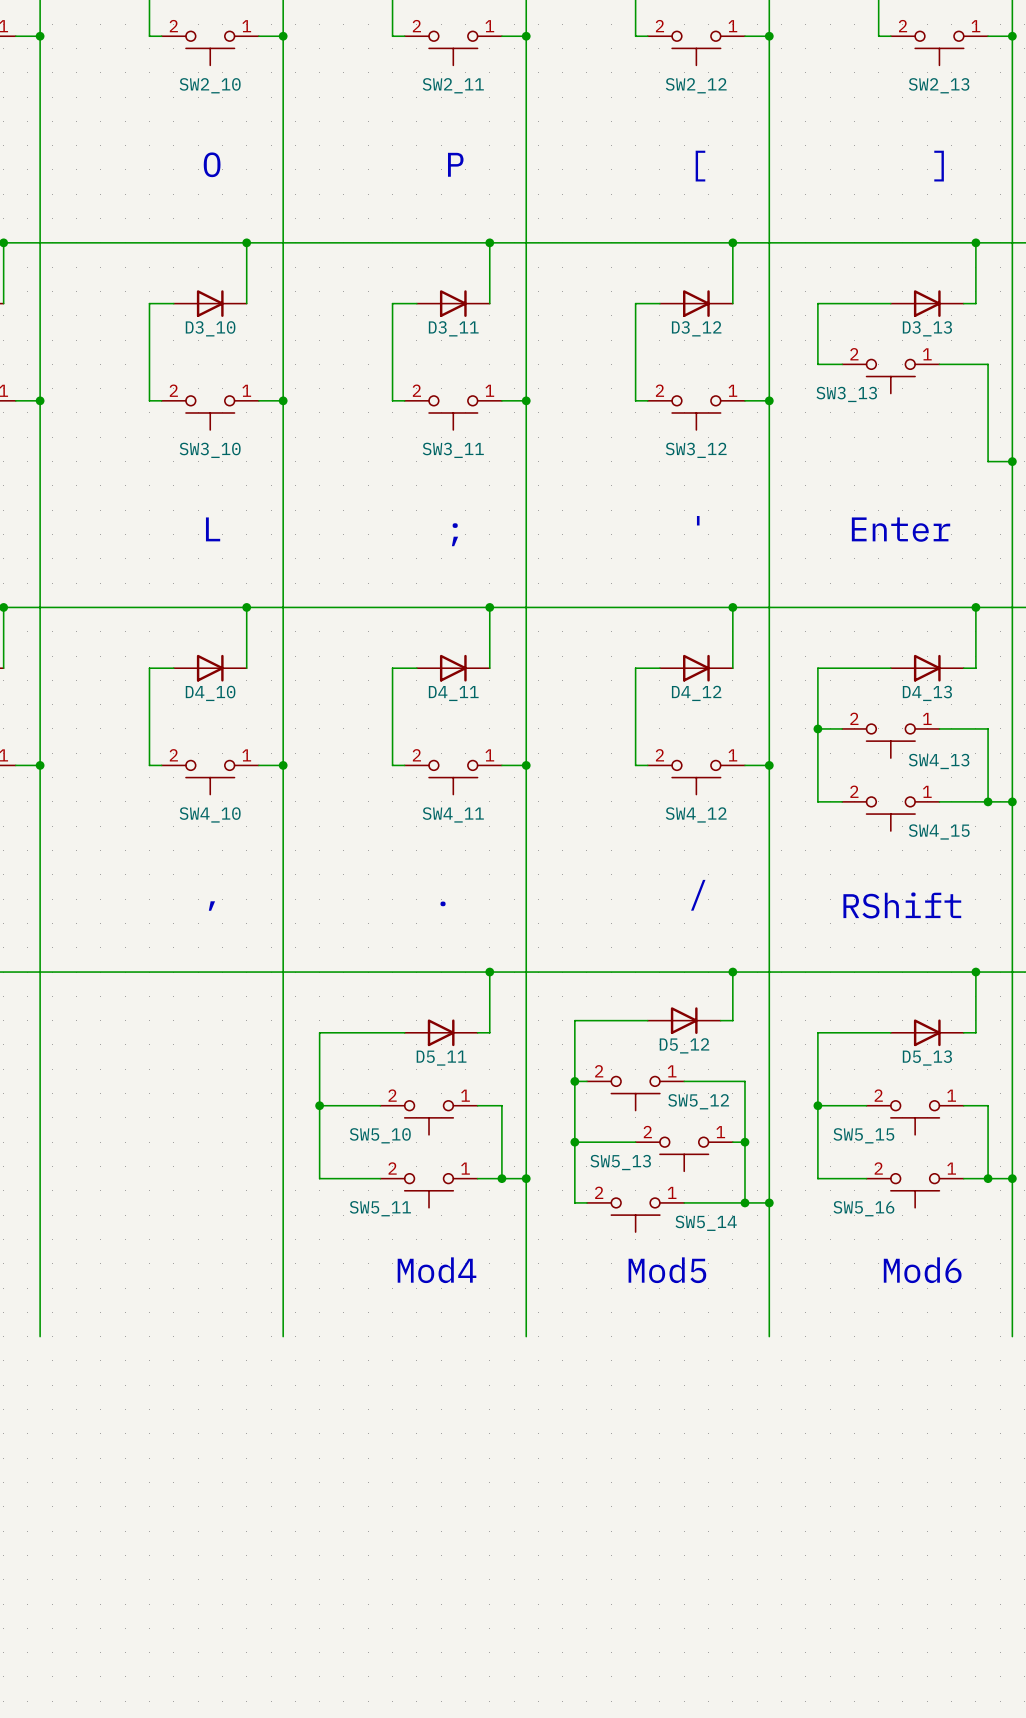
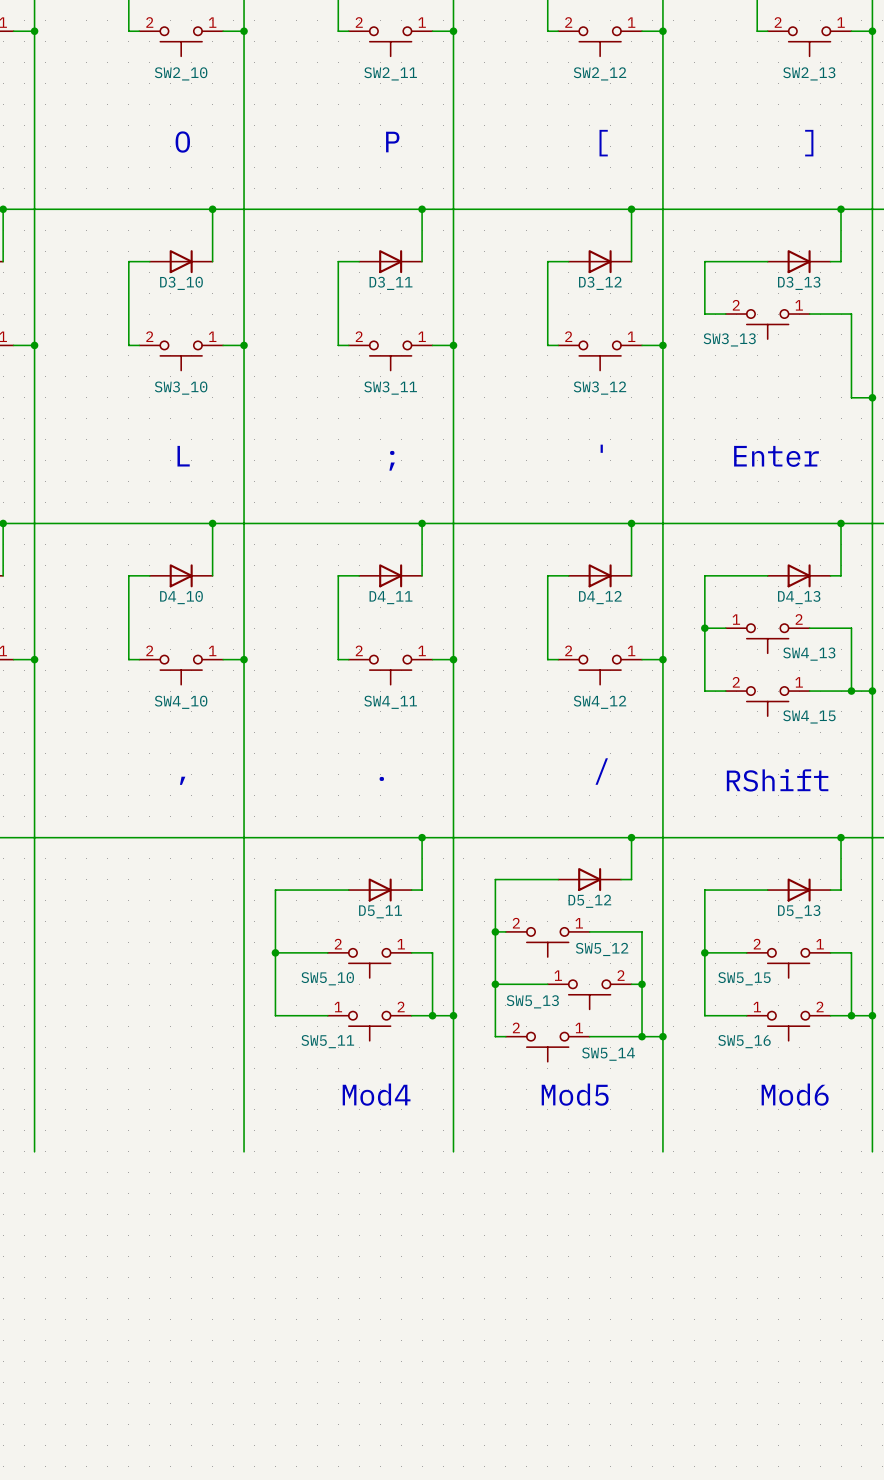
SW4_13 flip: as is (890, 741) -> left-right (767, 638)
SW5_13 flip: as is (684, 1154) -> left-right (589, 994)
SW5_11 flip: as is (429, 1190) -> left-right (369, 1026)
SW5_16 flip: as is (915, 1190) -> left-right (788, 1026)

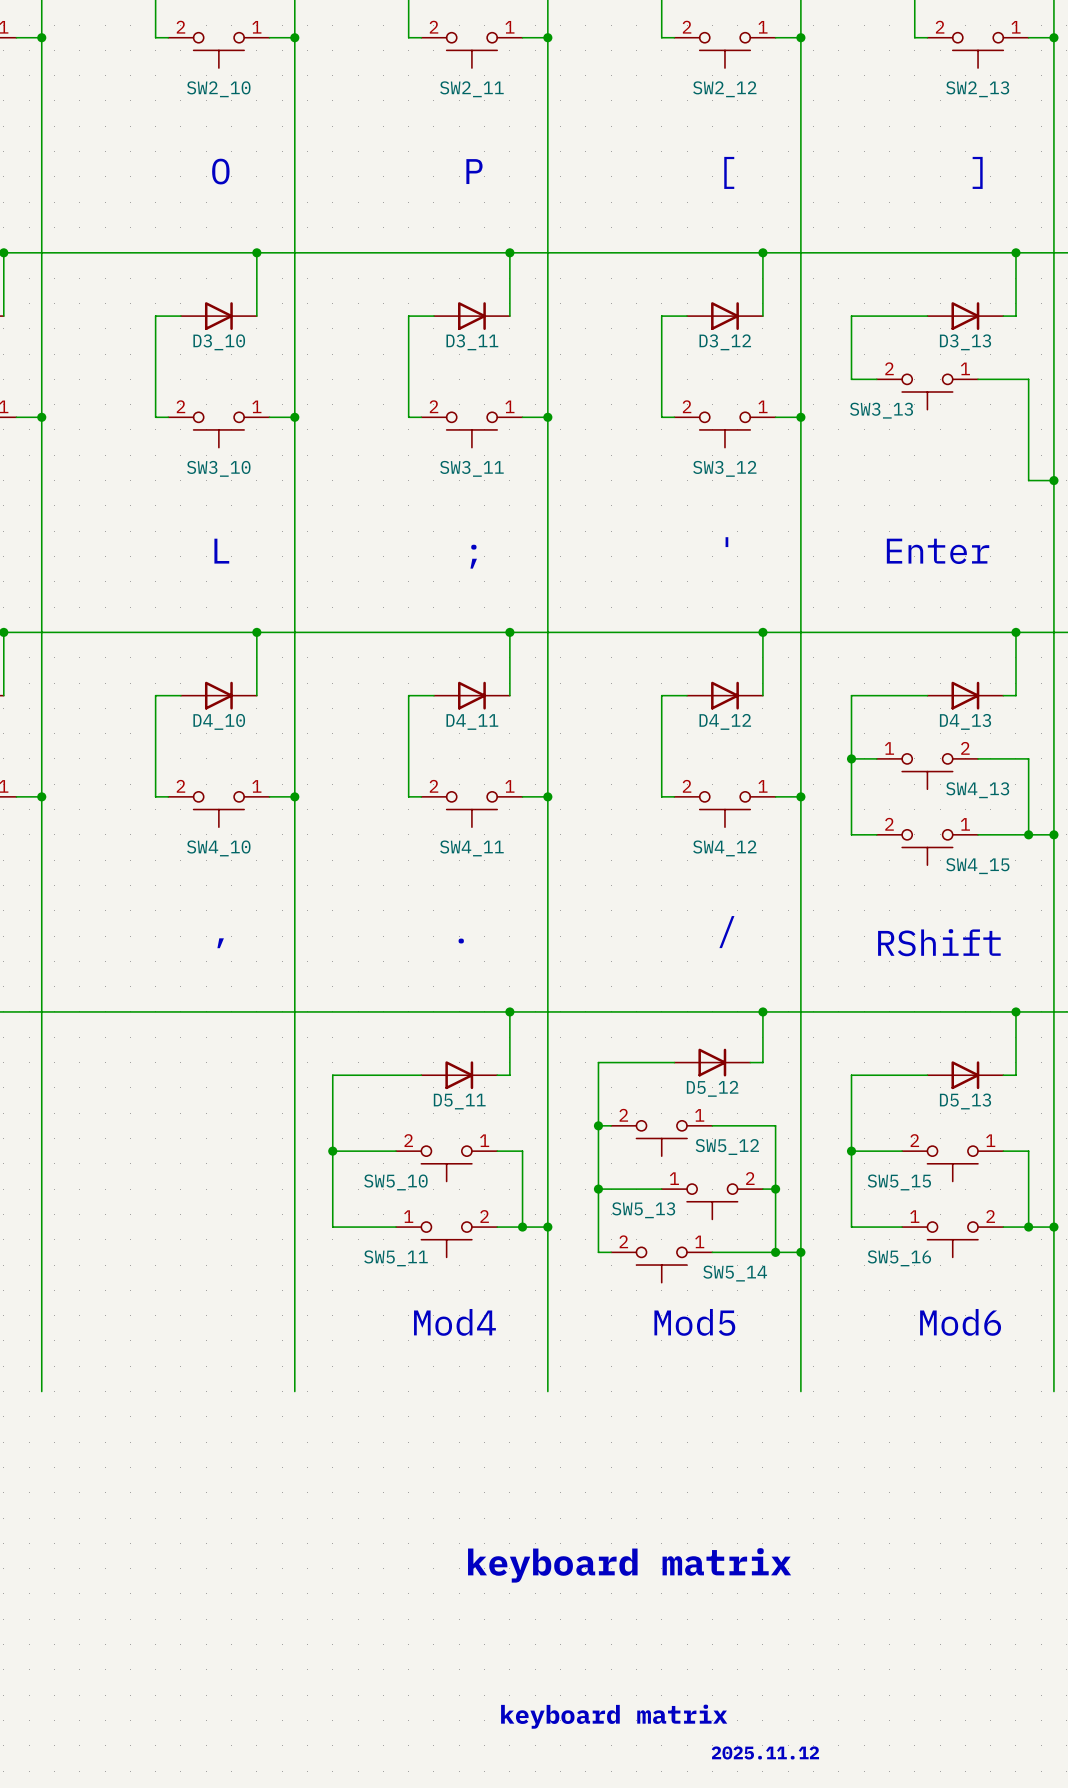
text: none -> keyboard matrix (629, 1565)
text: none -> keyboard matrix (614, 1716)
text: none -> 2025.11.12 (765, 1752)

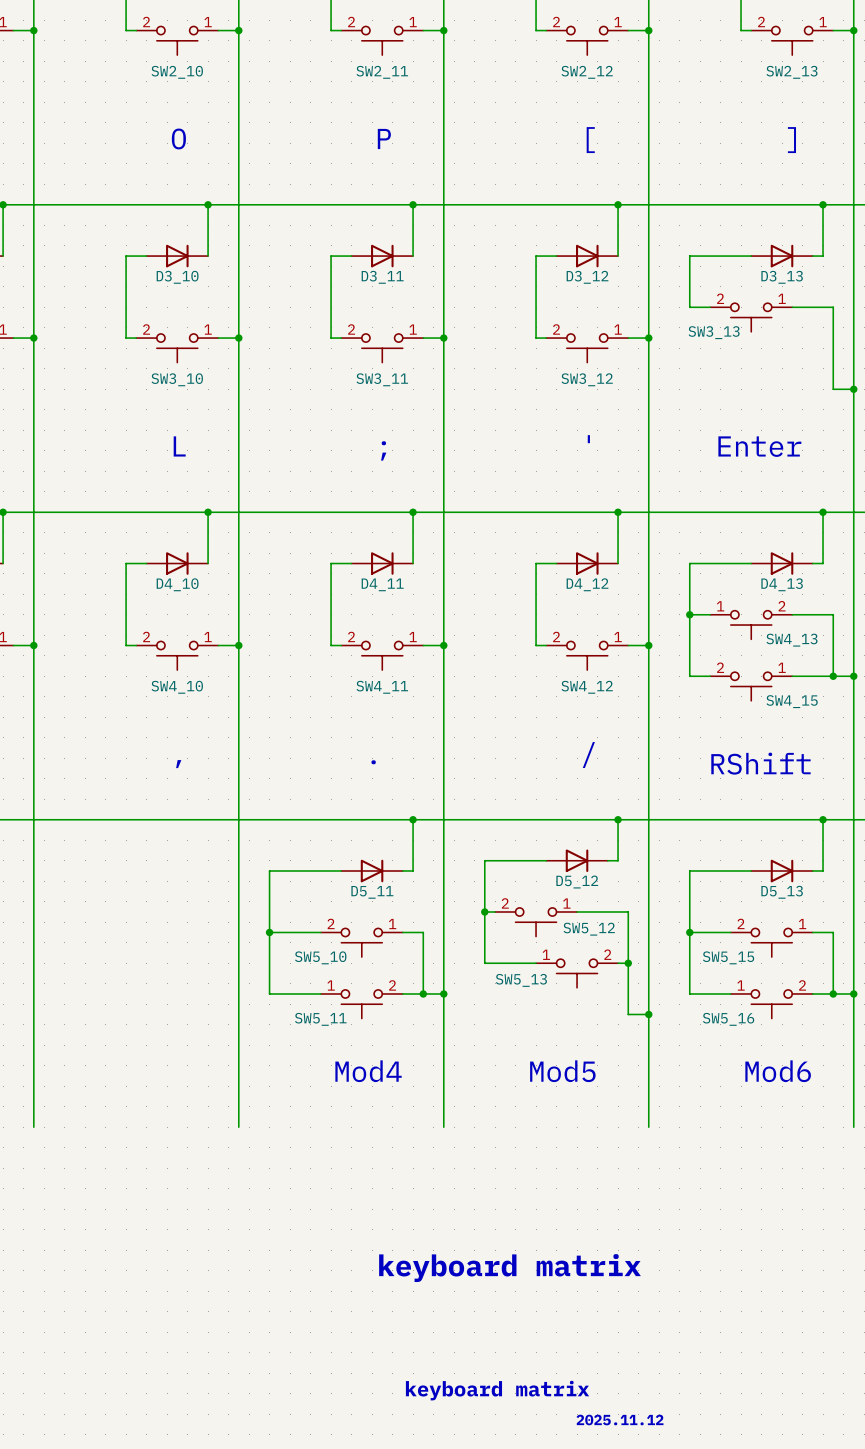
wire: (598, 1189) (598, 1252) (611, 1252) -> none
junction: (598, 1189) -> none
wire: (712, 1252) (775, 1252) -> none
junction: (775, 1252) -> none
SW5_14: (661, 1265) -> none

